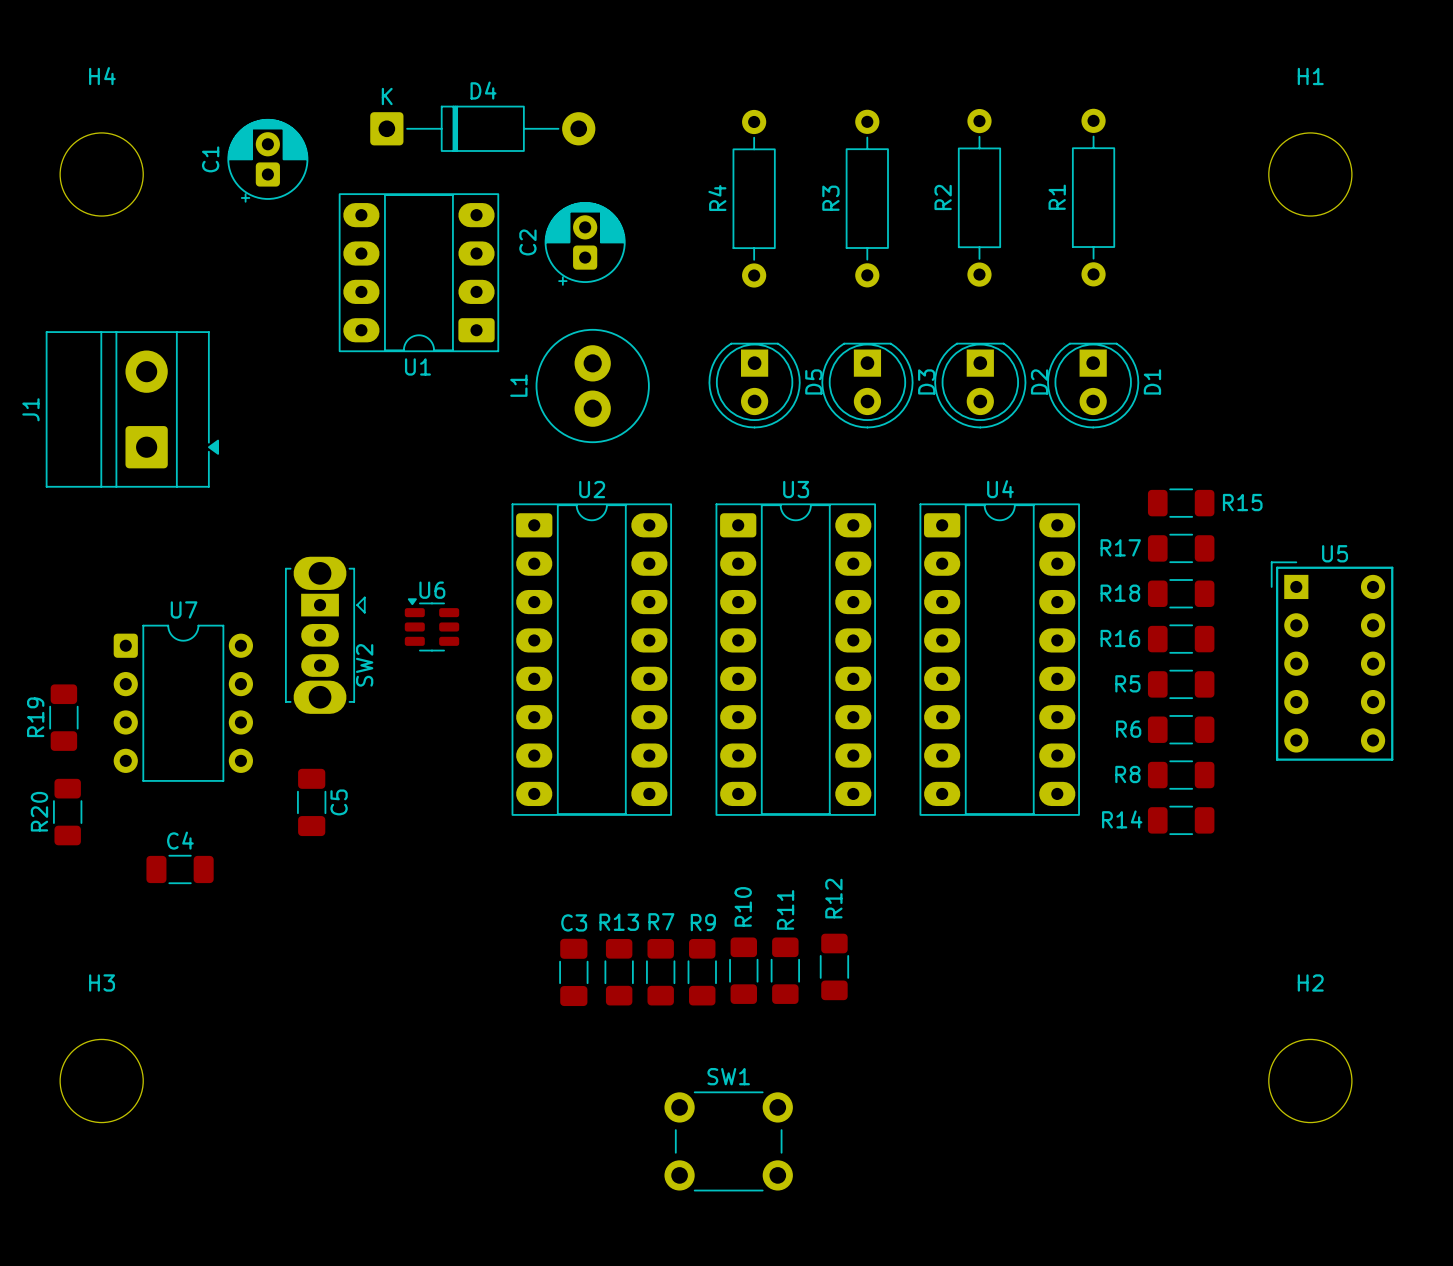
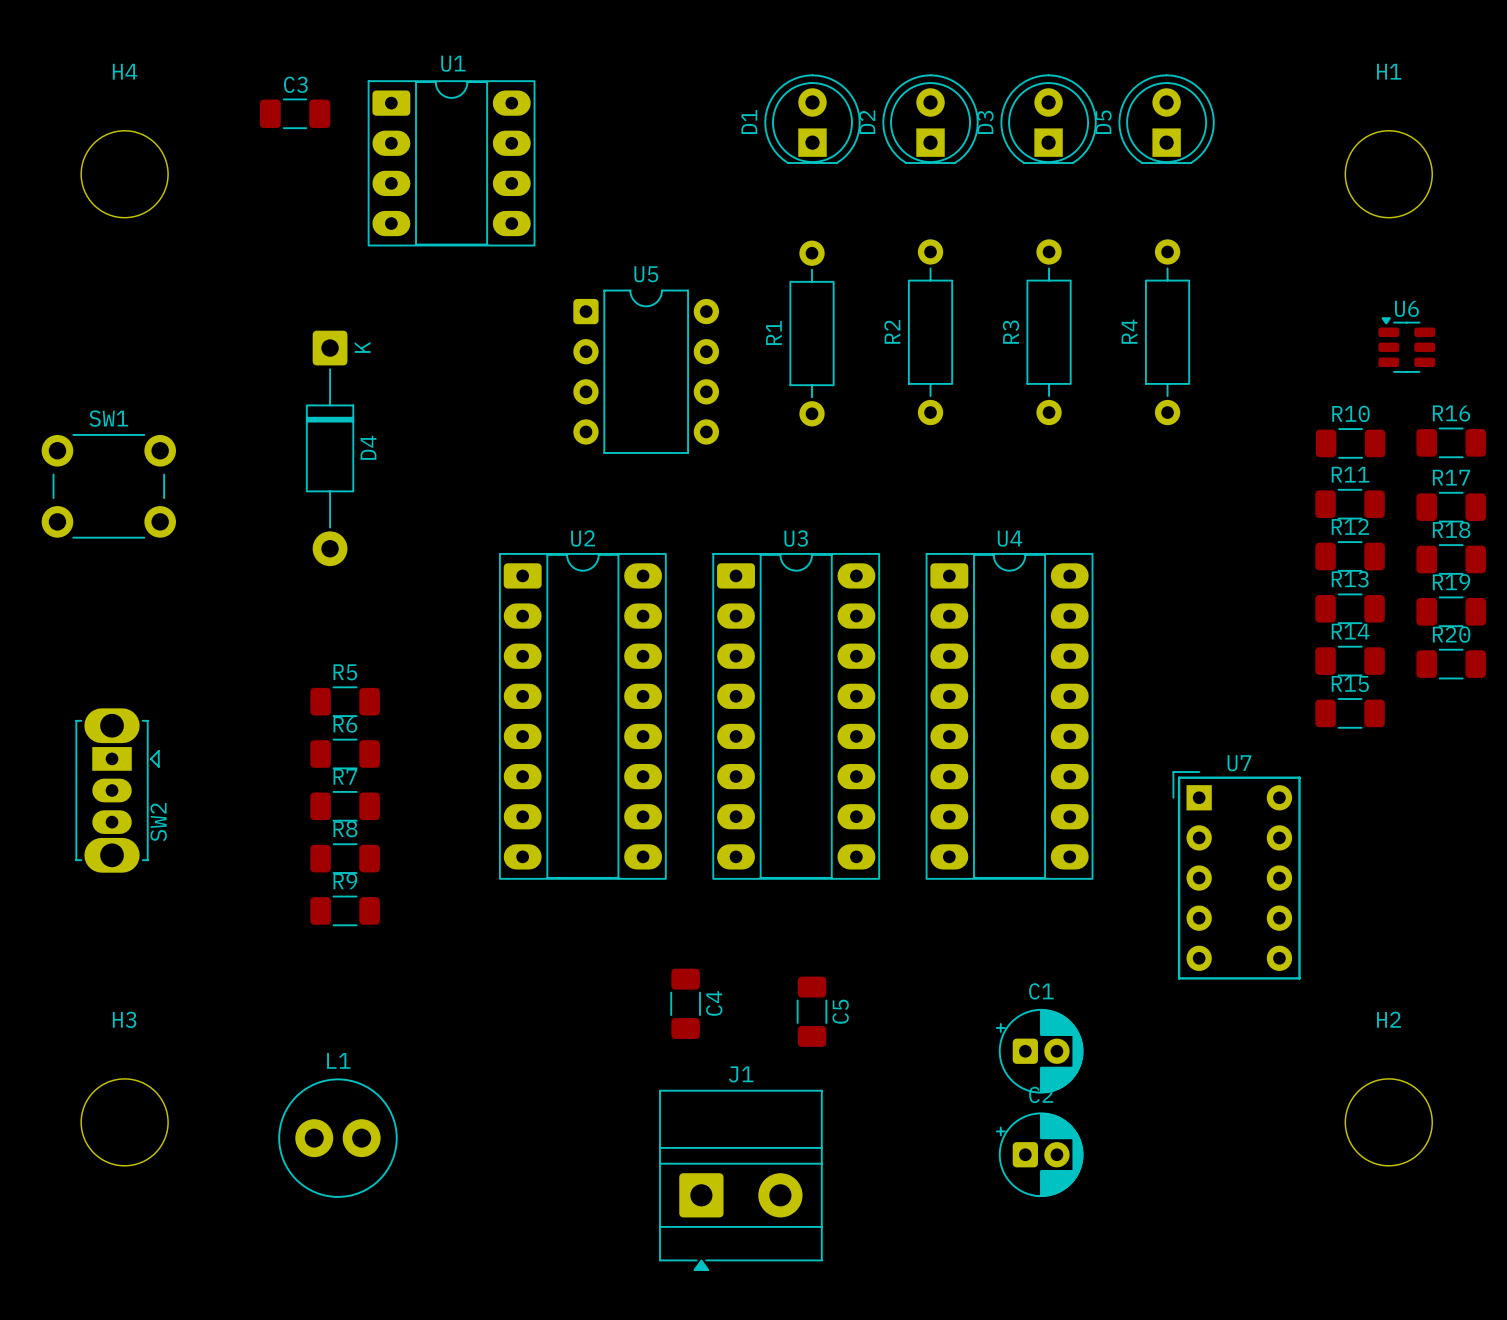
D4 rotation: 0° (482, 128) -> 90° clockwise (330, 448)
D4 position: (482, 128) -> (330, 448)
C1 rotation: 0° (267, 160) -> 90° clockwise (1039, 1051)
C1 position: (267, 160) -> (1039, 1051)
R2 position: (979, 197) -> (930, 332)
R1 position: (1093, 197) -> (812, 333)
R4 position: (754, 198) -> (1167, 332)
R3 position: (867, 198) -> (1049, 332)
C2 rotation: 0° (585, 243) -> 90° clockwise (1039, 1154)
C2 position: (585, 243) -> (1039, 1154)
U1 rotation: 0° (418, 272) -> 180° (451, 163)
U1 position: (418, 272) -> (451, 163)
D5 rotation: 0° (754, 385) -> 180° (1166, 119)
D5 position: (754, 385) -> (1166, 119)
D3 rotation: 0° (867, 385) -> 180° (1048, 119)
D3 position: (867, 385) -> (1048, 119)
D2 rotation: 0° (980, 385) -> 180° (930, 119)
D2 position: (980, 385) -> (930, 119)
D1 rotation: 0° (1093, 385) -> 180° (812, 119)
D1 position: (1093, 385) -> (812, 119)
L1 rotation: 0° (592, 386) -> 90° clockwise (337, 1138)
L1 position: (592, 386) -> (337, 1138)
J1 rotation: 0° (132, 409) -> 90° clockwise (740, 1180)
J1 position: (132, 409) -> (740, 1180)
R15 name position: R15 (1242, 502) -> R15 (1350, 684)
R15 position: (1181, 503) -> (1350, 713)
R17 name position: R17 (1120, 547) -> R17 (1451, 477)
R17 position: (1181, 548) -> (1451, 507)
U5 footprint: [1270, 561, 1394, 761] -> [573, 289, 720, 454]
R18 name position: R18 (1120, 593) -> R18 (1451, 529)
R18 position: (1181, 593) -> (1451, 559)
U7 footprint: [113, 624, 253, 782] -> [1172, 771, 1301, 980]
U6 position: (431, 624) -> (1406, 345)
SW2 position: (325, 635) -> (117, 790)
R16 name position: R16 (1120, 638) -> R16 (1451, 413)
R16 position: (1181, 639) -> (1451, 442)
U2 position: (591, 659) -> (582, 716)
U3 position: (795, 659) -> (796, 716)
U4 position: (999, 659) -> (1009, 716)
R5 name position: R5 (1127, 683) -> R5 (345, 672)
R5 position: (1181, 684) -> (345, 701)
R19 rotation: 0° (63, 717) -> 90° clockwise (1451, 611)
R19 position: (63, 717) -> (1451, 611)
R6 name position: R6 (1128, 729) -> R6 (345, 724)
R6 position: (1181, 729) -> (345, 754)
R8 name position: R8 (1127, 774) -> R8 (345, 829)
R8 position: (1181, 775) -> (345, 858)
C5 position: (311, 802) -> (812, 1011)
R20 rotation: 0° (67, 812) -> 90° clockwise (1451, 664)
R20 position: (67, 812) -> (1451, 664)
R14 name position: R14 (1122, 819) -> R14 (1350, 631)
R14 position: (1181, 820) -> (1350, 661)
C4 rotation: 0° (180, 869) -> 90° clockwise (685, 1003)
C4 position: (180, 869) -> (685, 1003)
R12 name position: R12 (833, 898) -> R12 (1350, 526)
R10 name position: R10 (743, 906) -> R10 (1350, 413)
R11 name position: R11 (785, 909) -> R11 (1350, 474)
R12 rotation: 0° (834, 966) -> 90° clockwise (1350, 556)
R12 position: (834, 966) -> (1350, 556)
R10 rotation: 0° (743, 970) -> 90° clockwise (1350, 443)
R10 position: (743, 970) -> (1350, 443)
R11 rotation: 0° (785, 970) -> 90° clockwise (1350, 504)
R11 position: (785, 970) -> (1350, 504)
C3 rotation: 0° (573, 972) -> 90° clockwise (295, 113)
C3 position: (573, 972) -> (295, 113)
R13 rotation: 0° (619, 972) -> 90° clockwise (1350, 608)
R13 position: (619, 972) -> (1350, 608)
R7 rotation: 0° (660, 972) -> 90° clockwise (345, 806)
R7 position: (660, 972) -> (345, 806)
R9 rotation: 0° (702, 972) -> 90° clockwise (345, 910)
R9 position: (702, 972) -> (345, 910)
SW1 position: (728, 1141) -> (108, 486)

